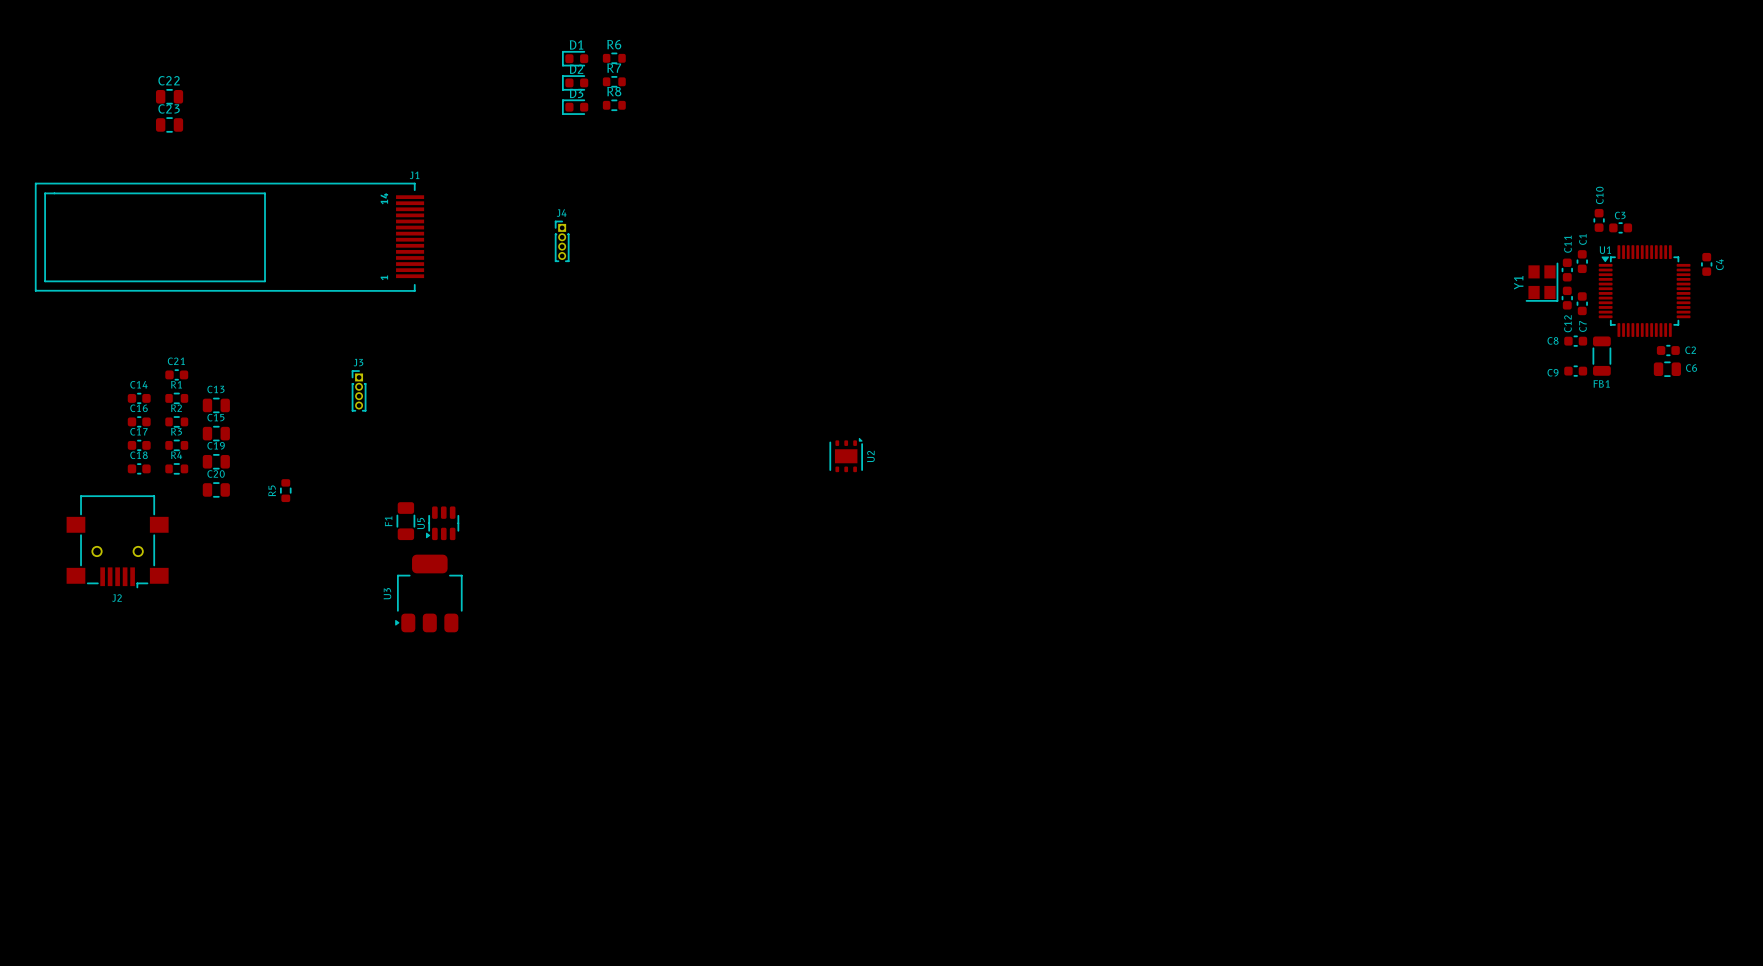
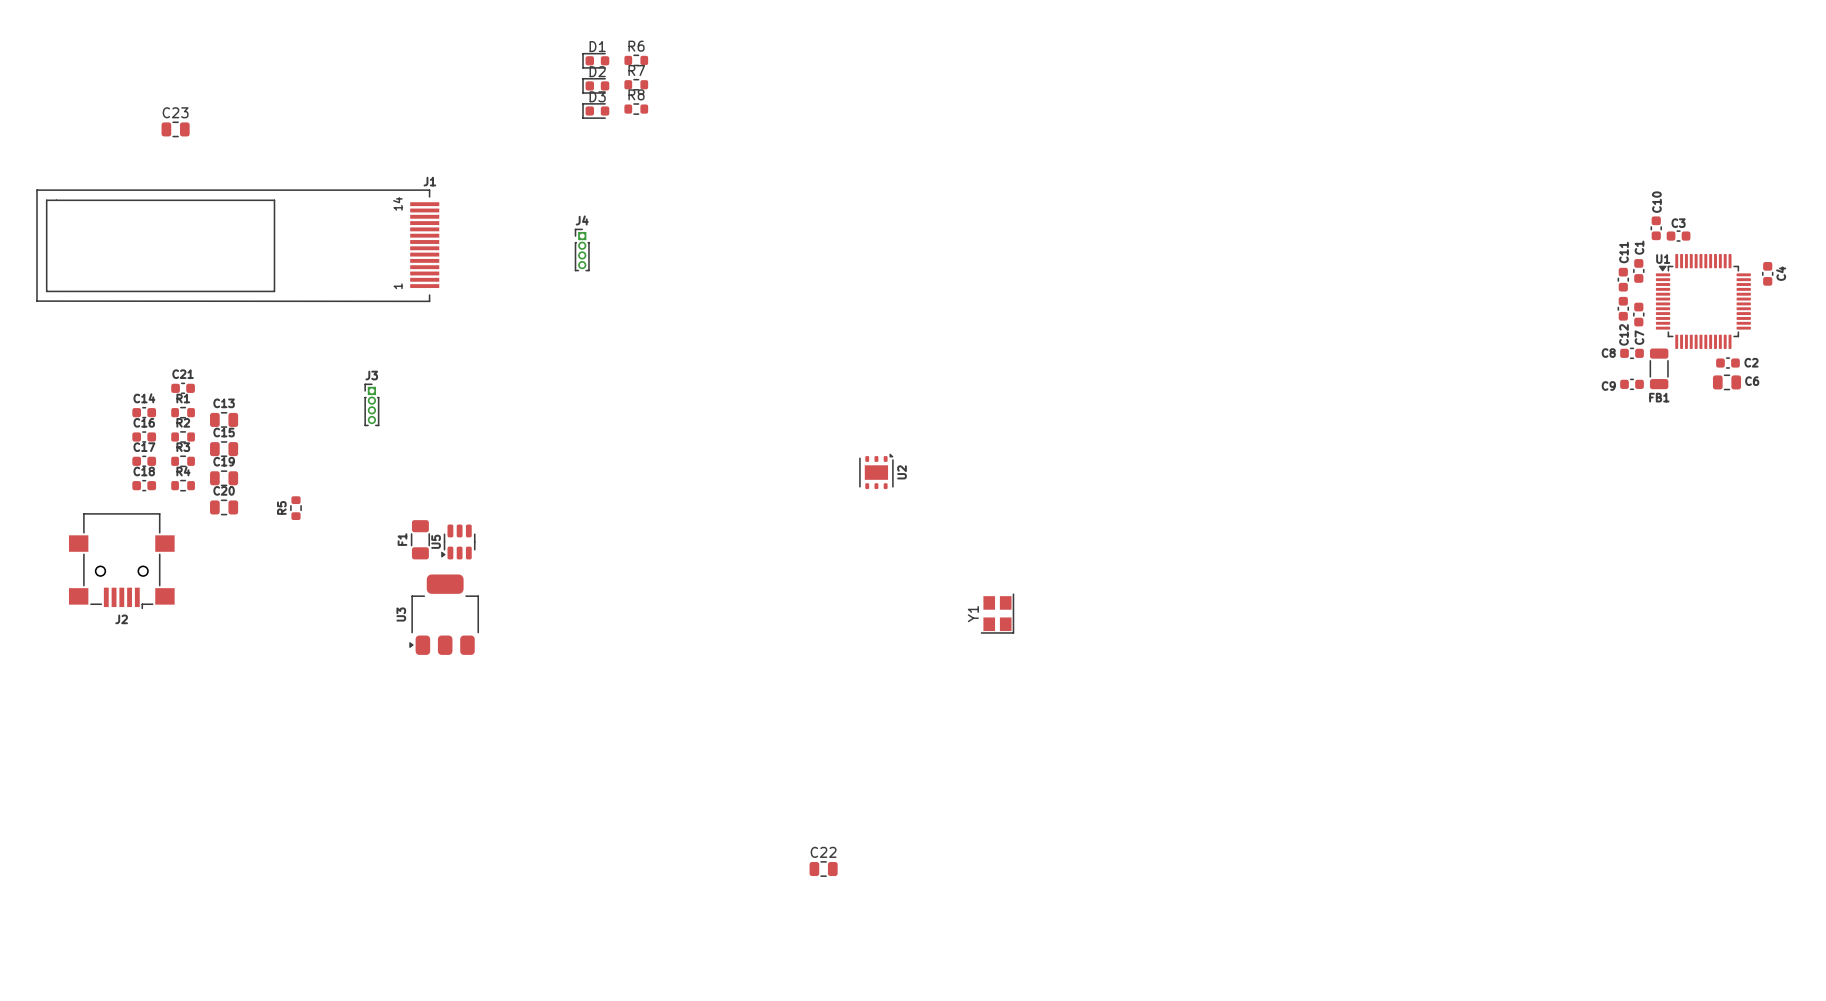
C22 position: (169, 96) -> (823, 869)
Y1 position: (1542, 282) -> (997, 613)

